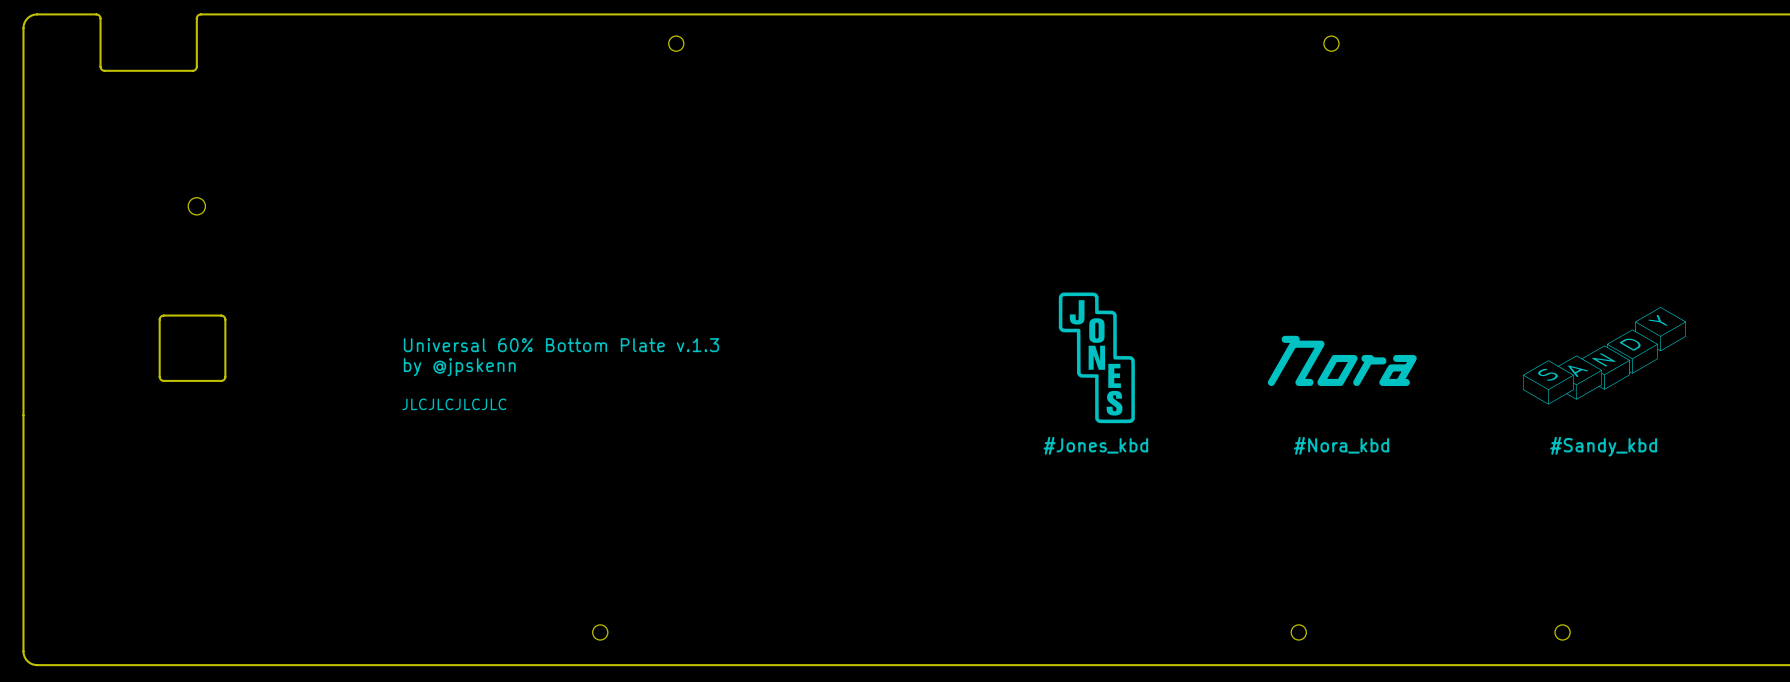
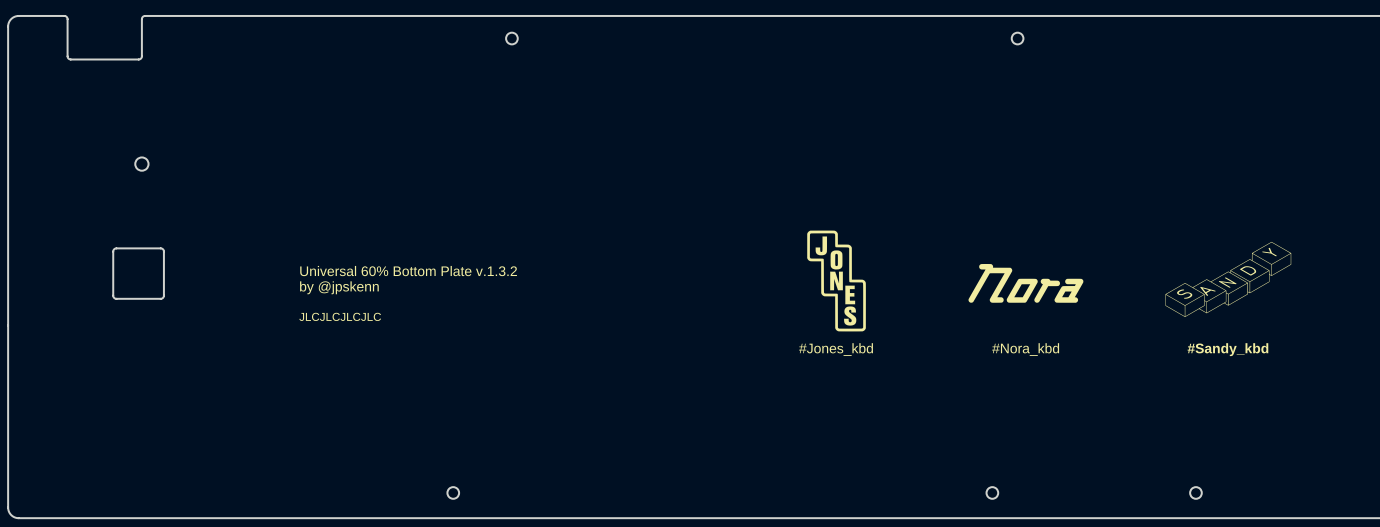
text: Universal 60% Bottom Plate v.1.3 (561, 345) -> Universal 60% Bottom Plate v.1.3.2 (408, 271)

